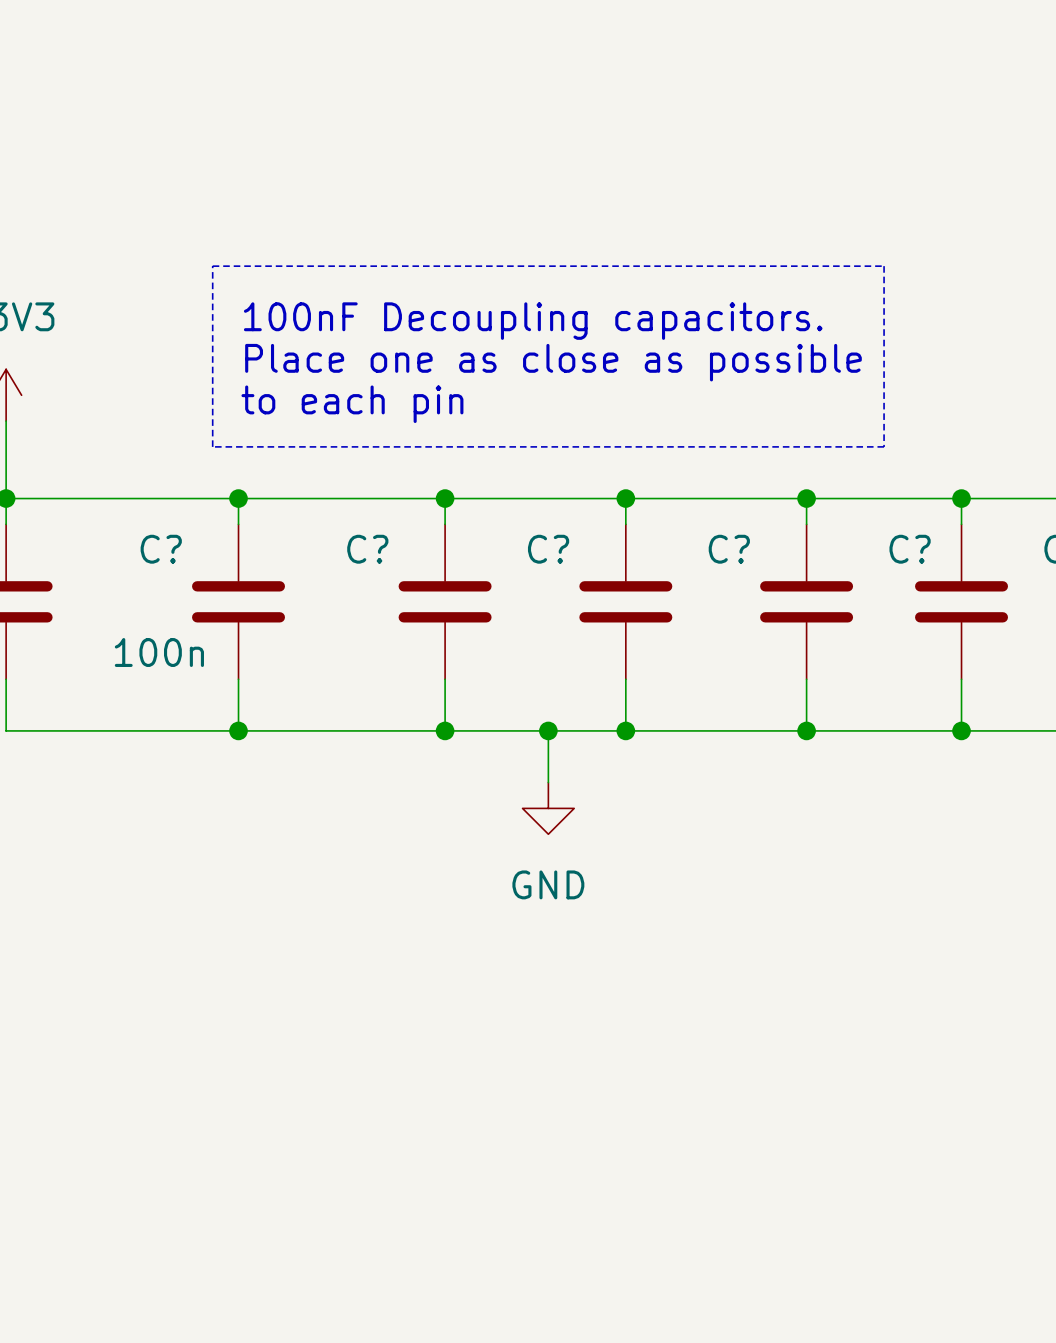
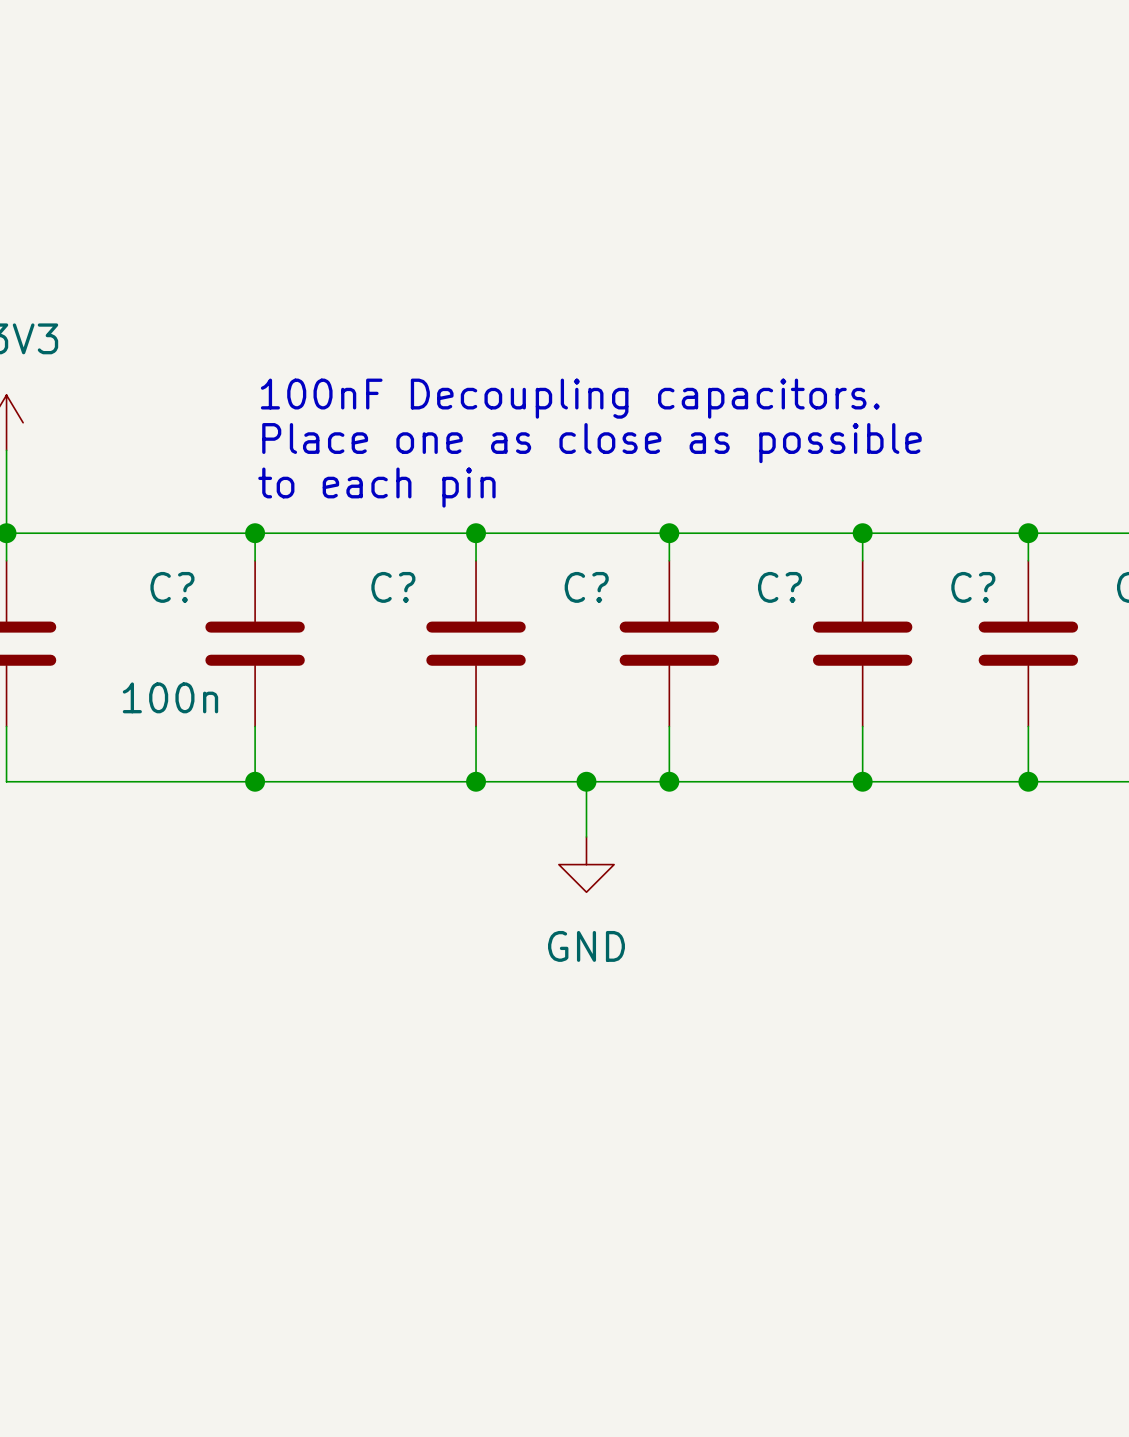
line: (212, 266) (884, 266) (884, 446) (212, 446) (212, 266) -> none
text: 100nF Decoupling capacitors. (533, 321) -> none
text: Place one as close as possible (553, 362) -> 100nF Decoupling capacitors. (570, 398)
text: to each pin (352, 404) -> Place one as close as possible (591, 443)
text: none -> to each pin (376, 487)

